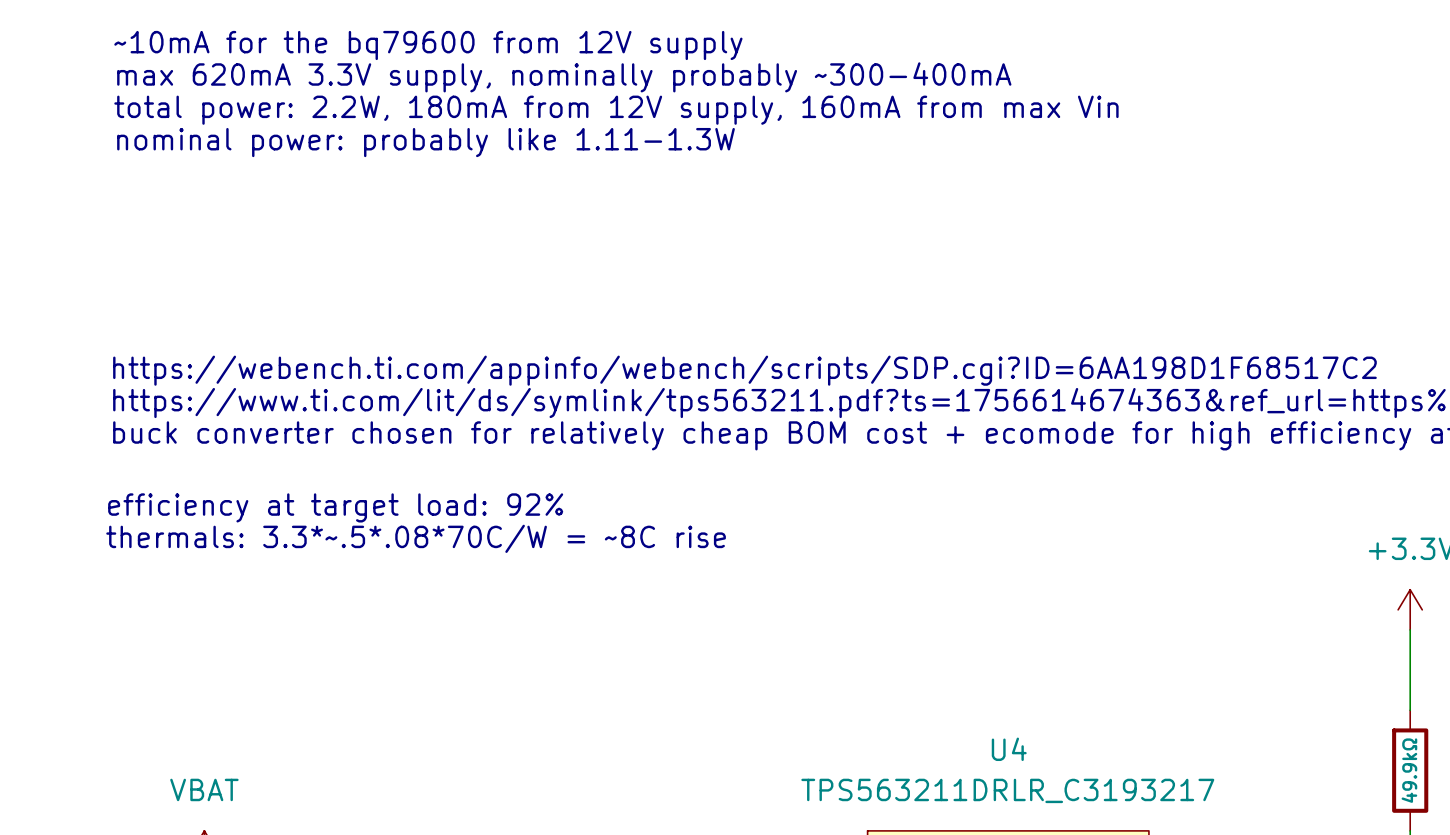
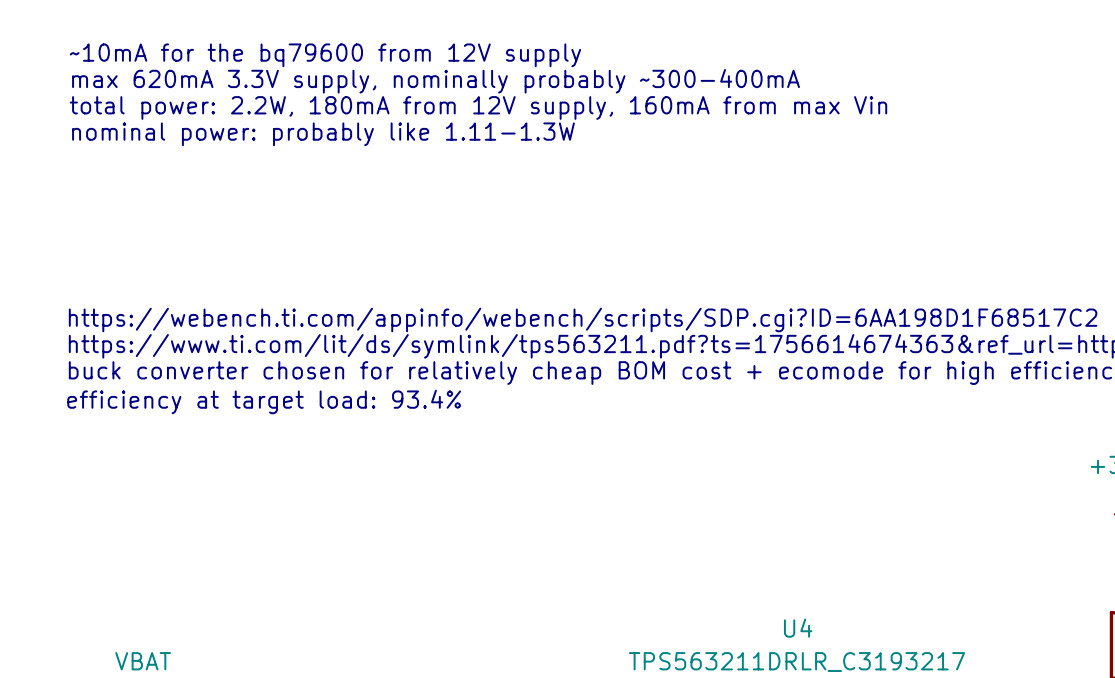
text: efficiency at target load: 92% (335, 507) -> efficiency at target load: 93.4% (264, 401)
text: thermals: 3.3*~.5*.08*70C/W = ~8C rise (416, 538) -> none

